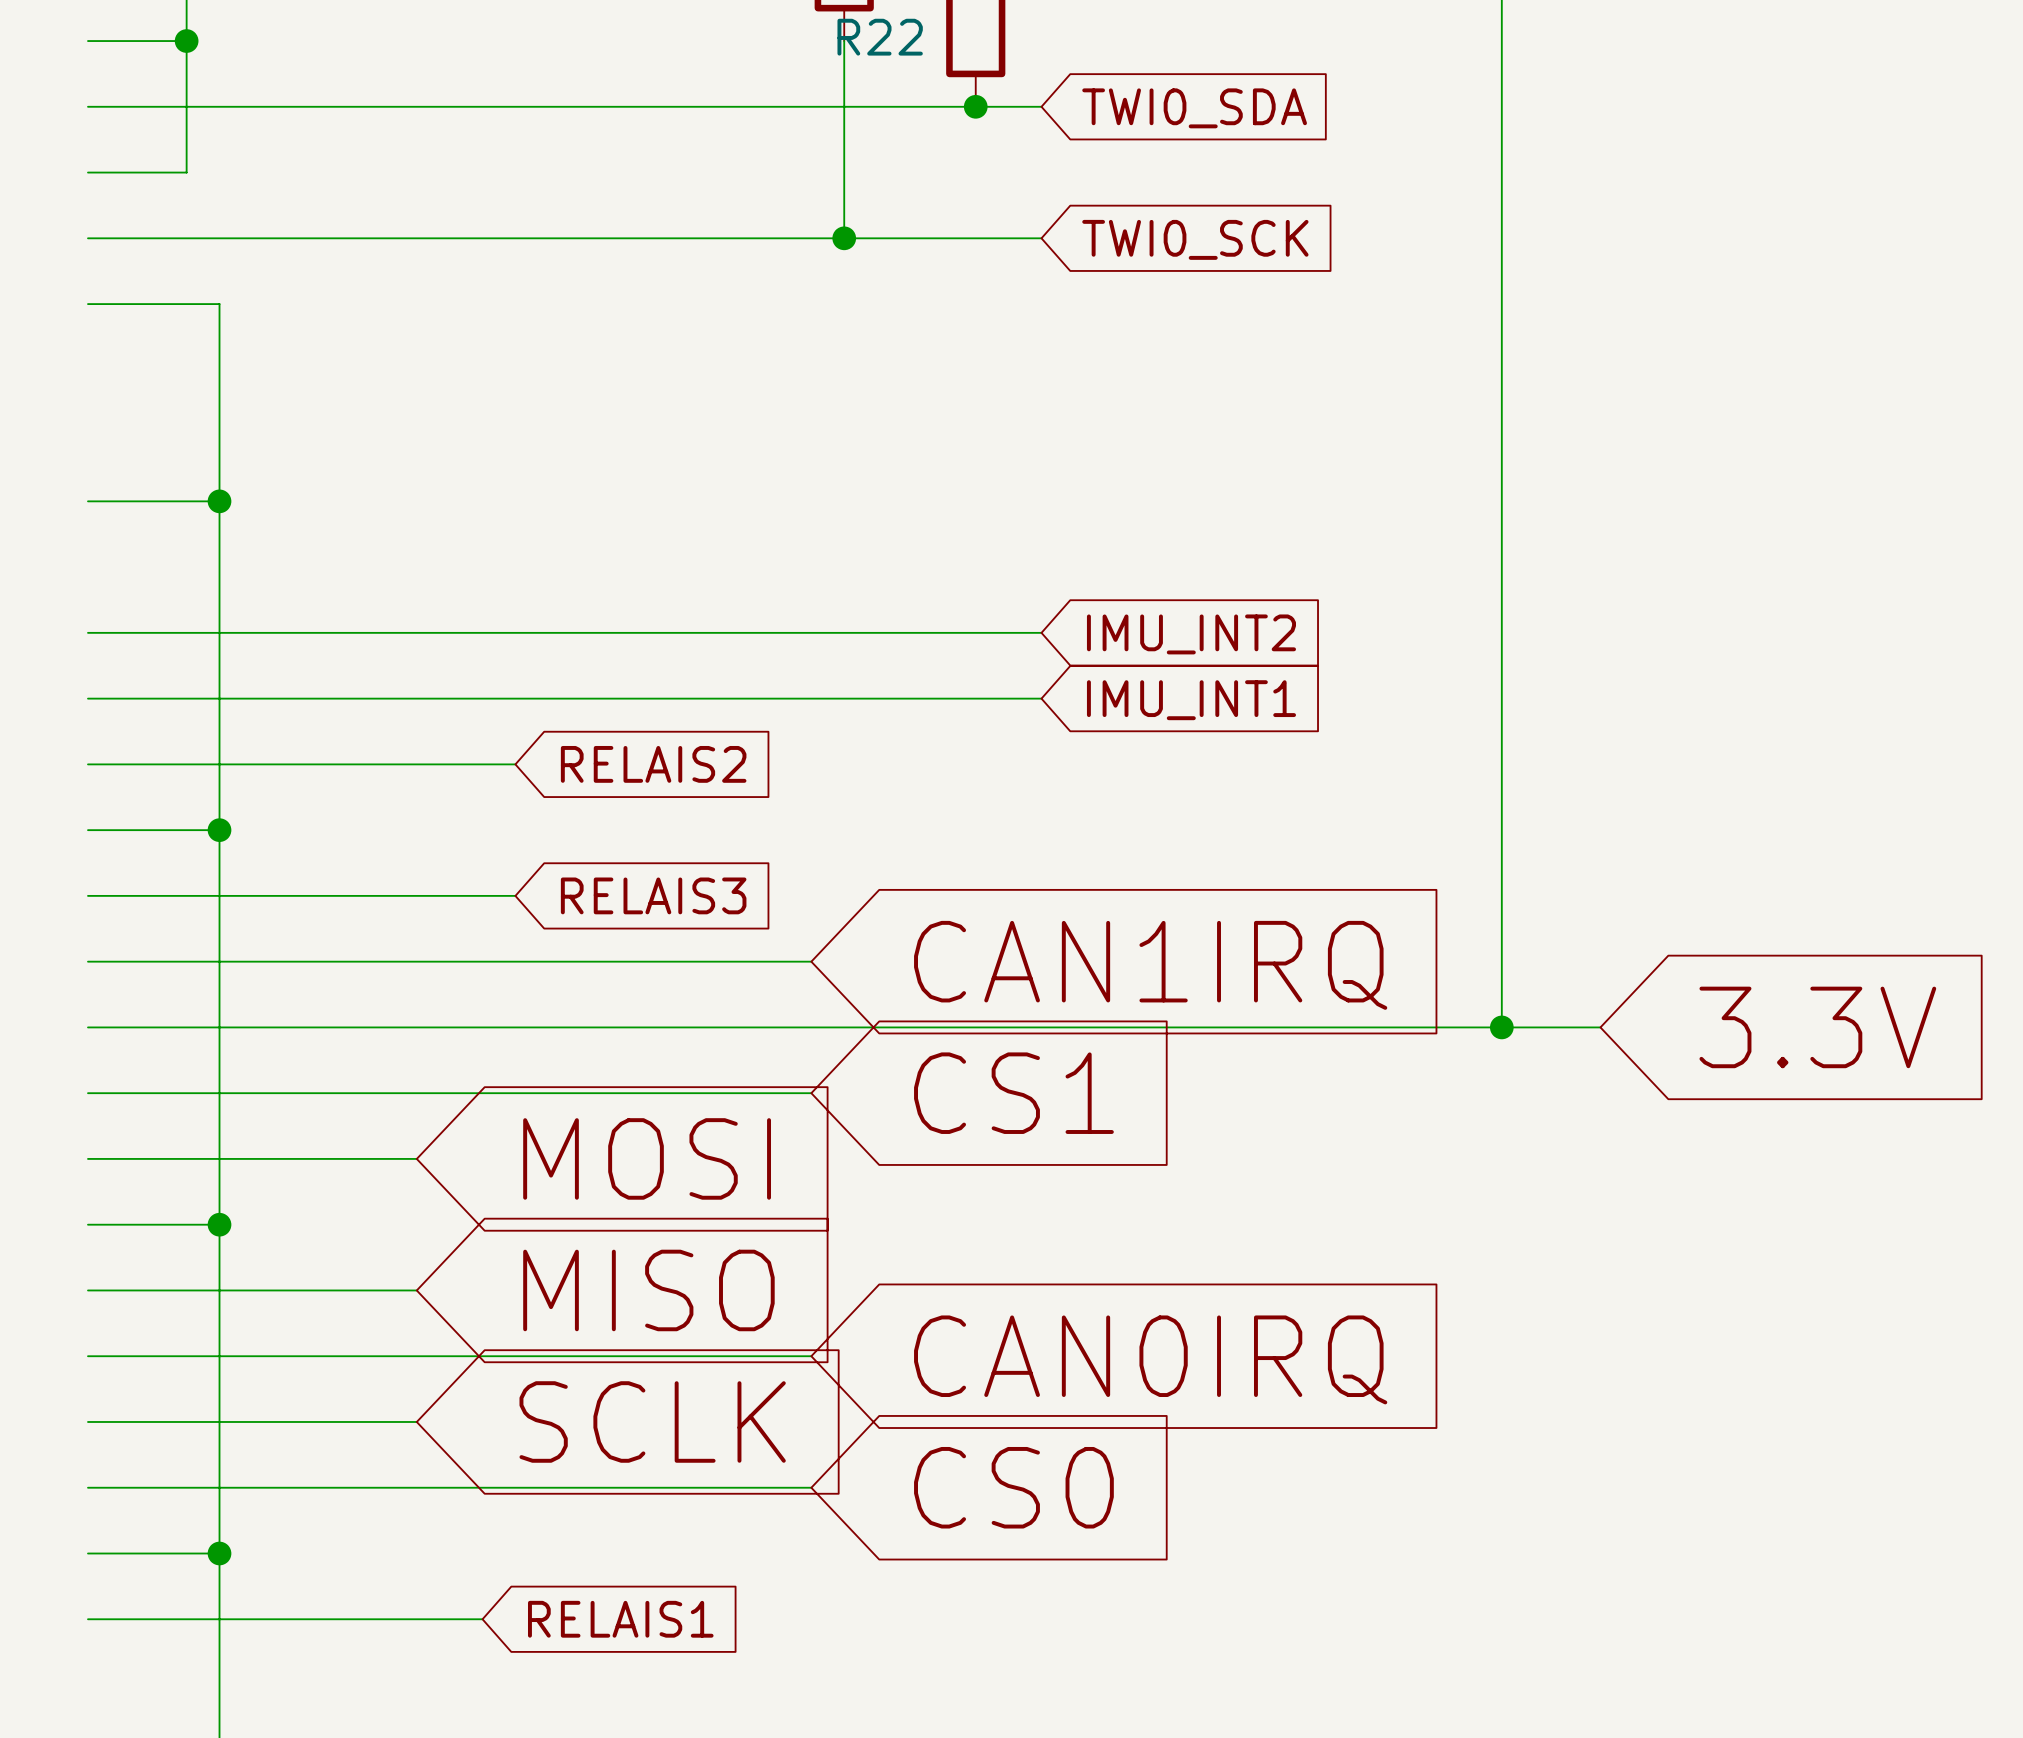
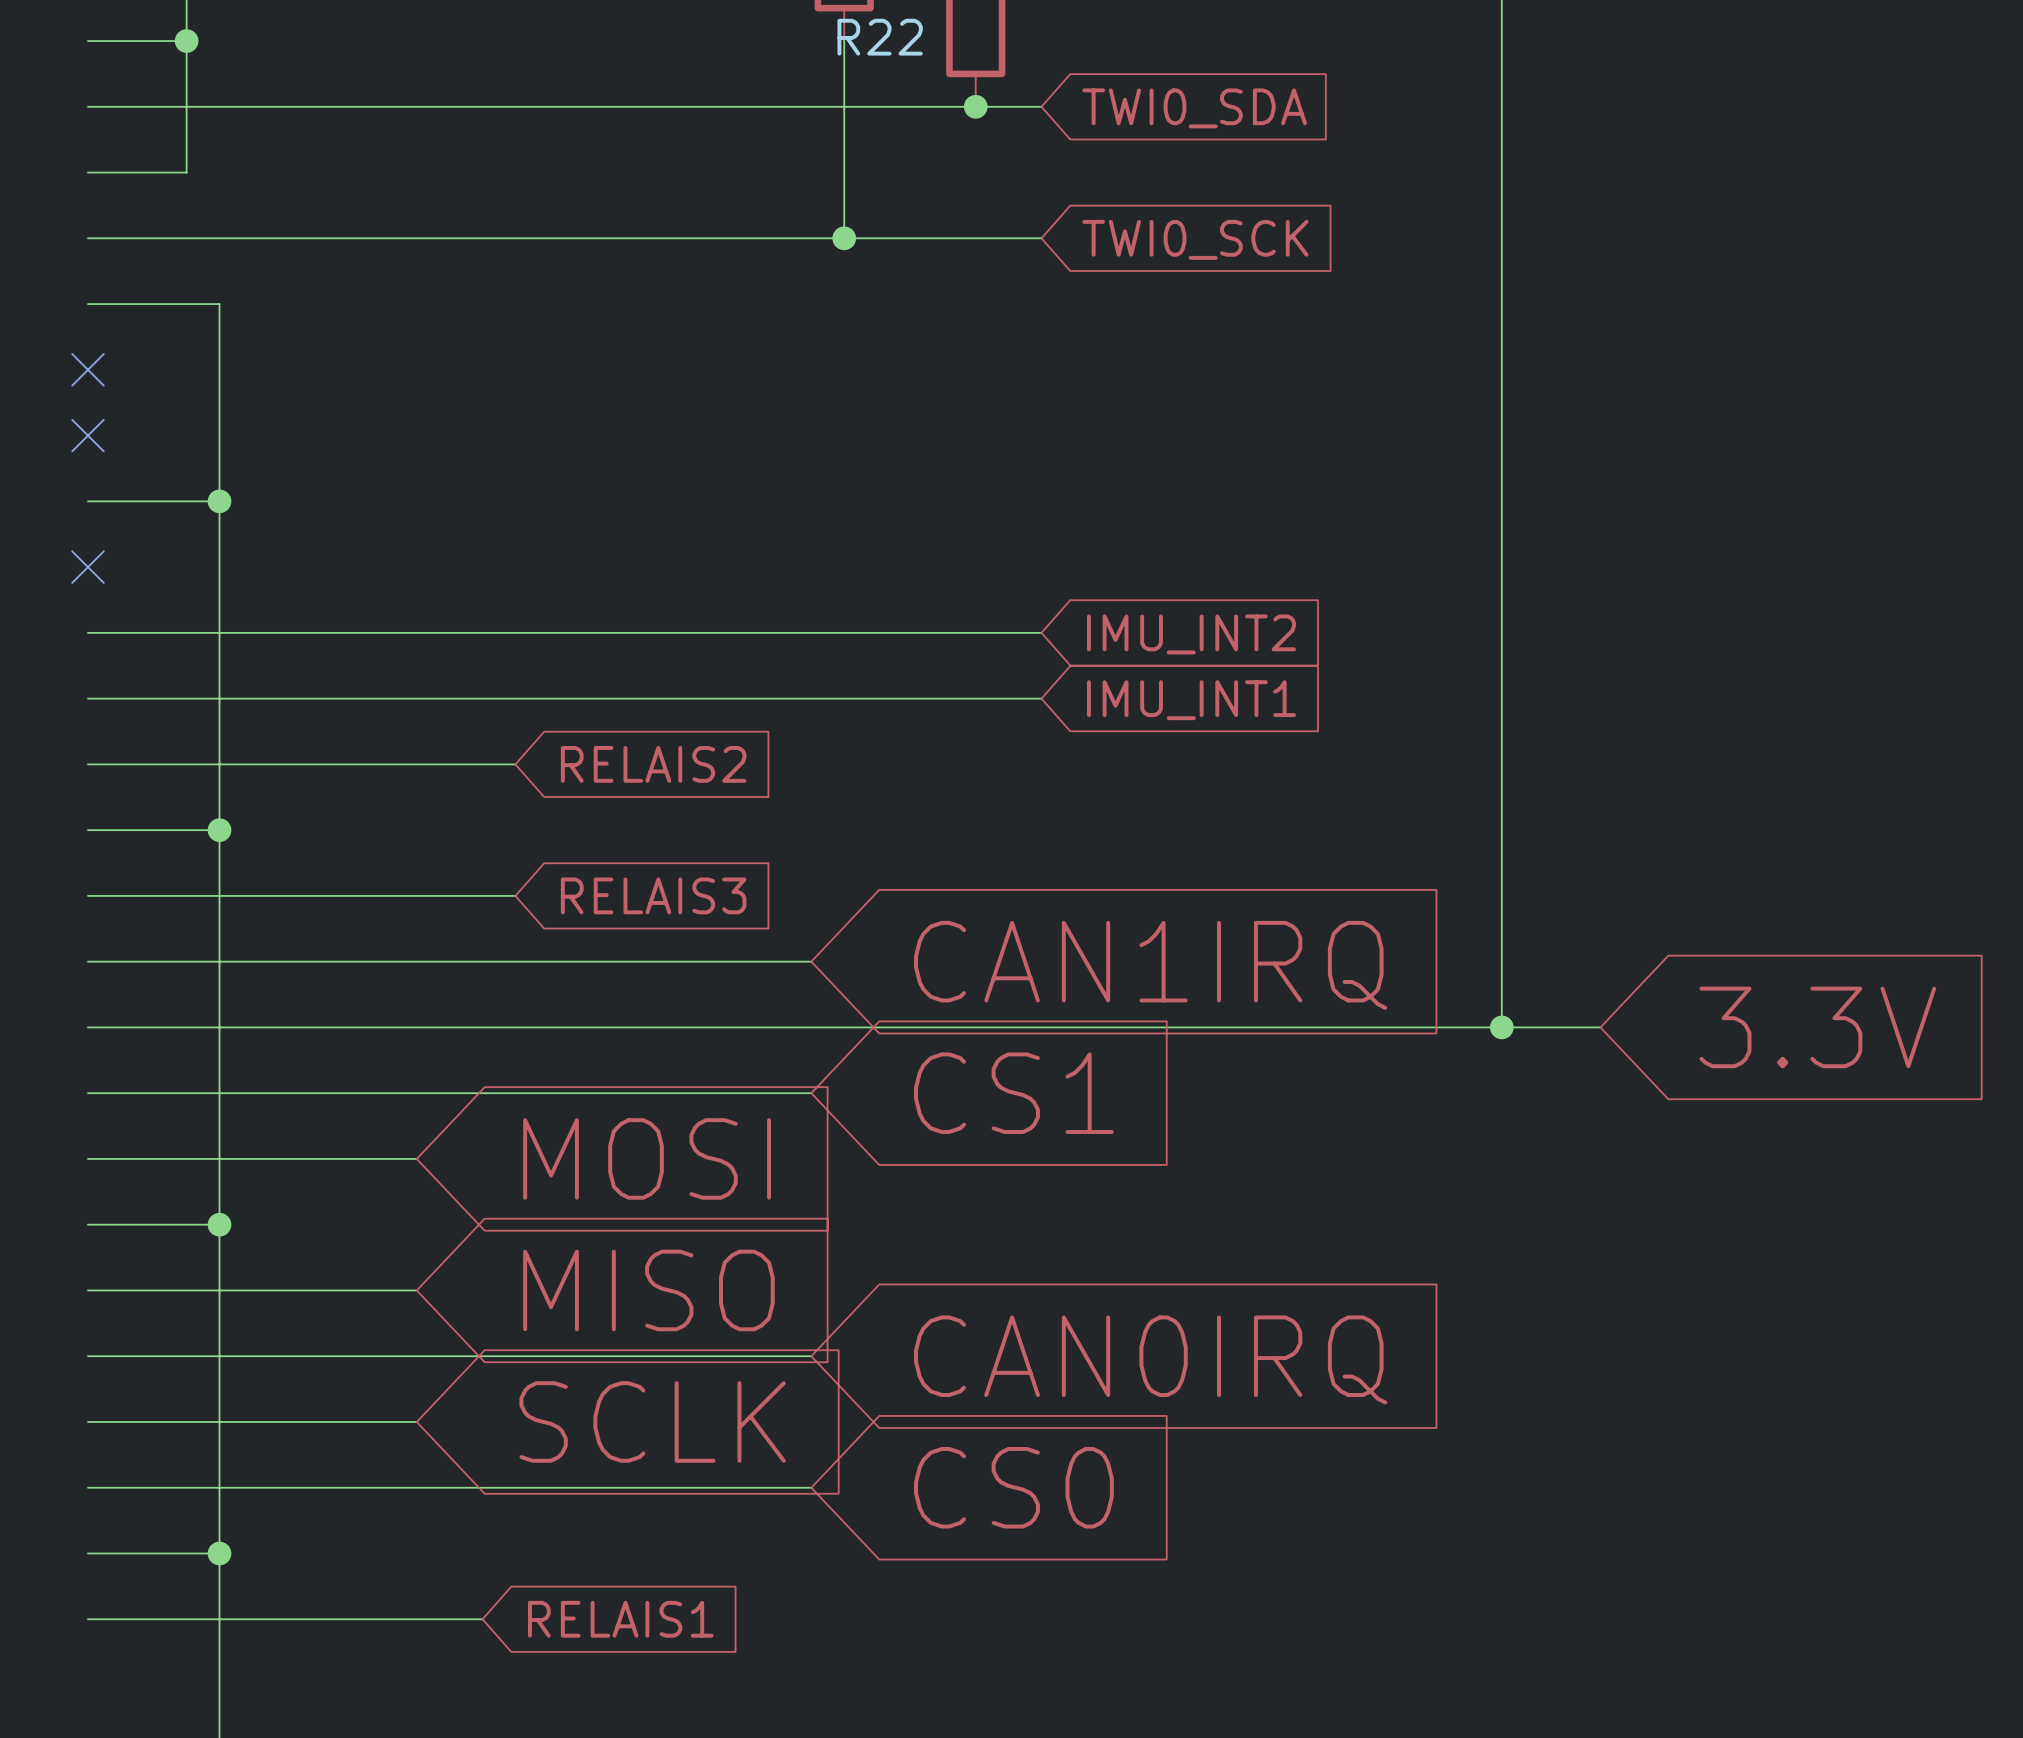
no-connect mark: none -> (87, 369)
no-connect mark: none -> (87, 435)
no-connect mark: none -> (87, 567)

